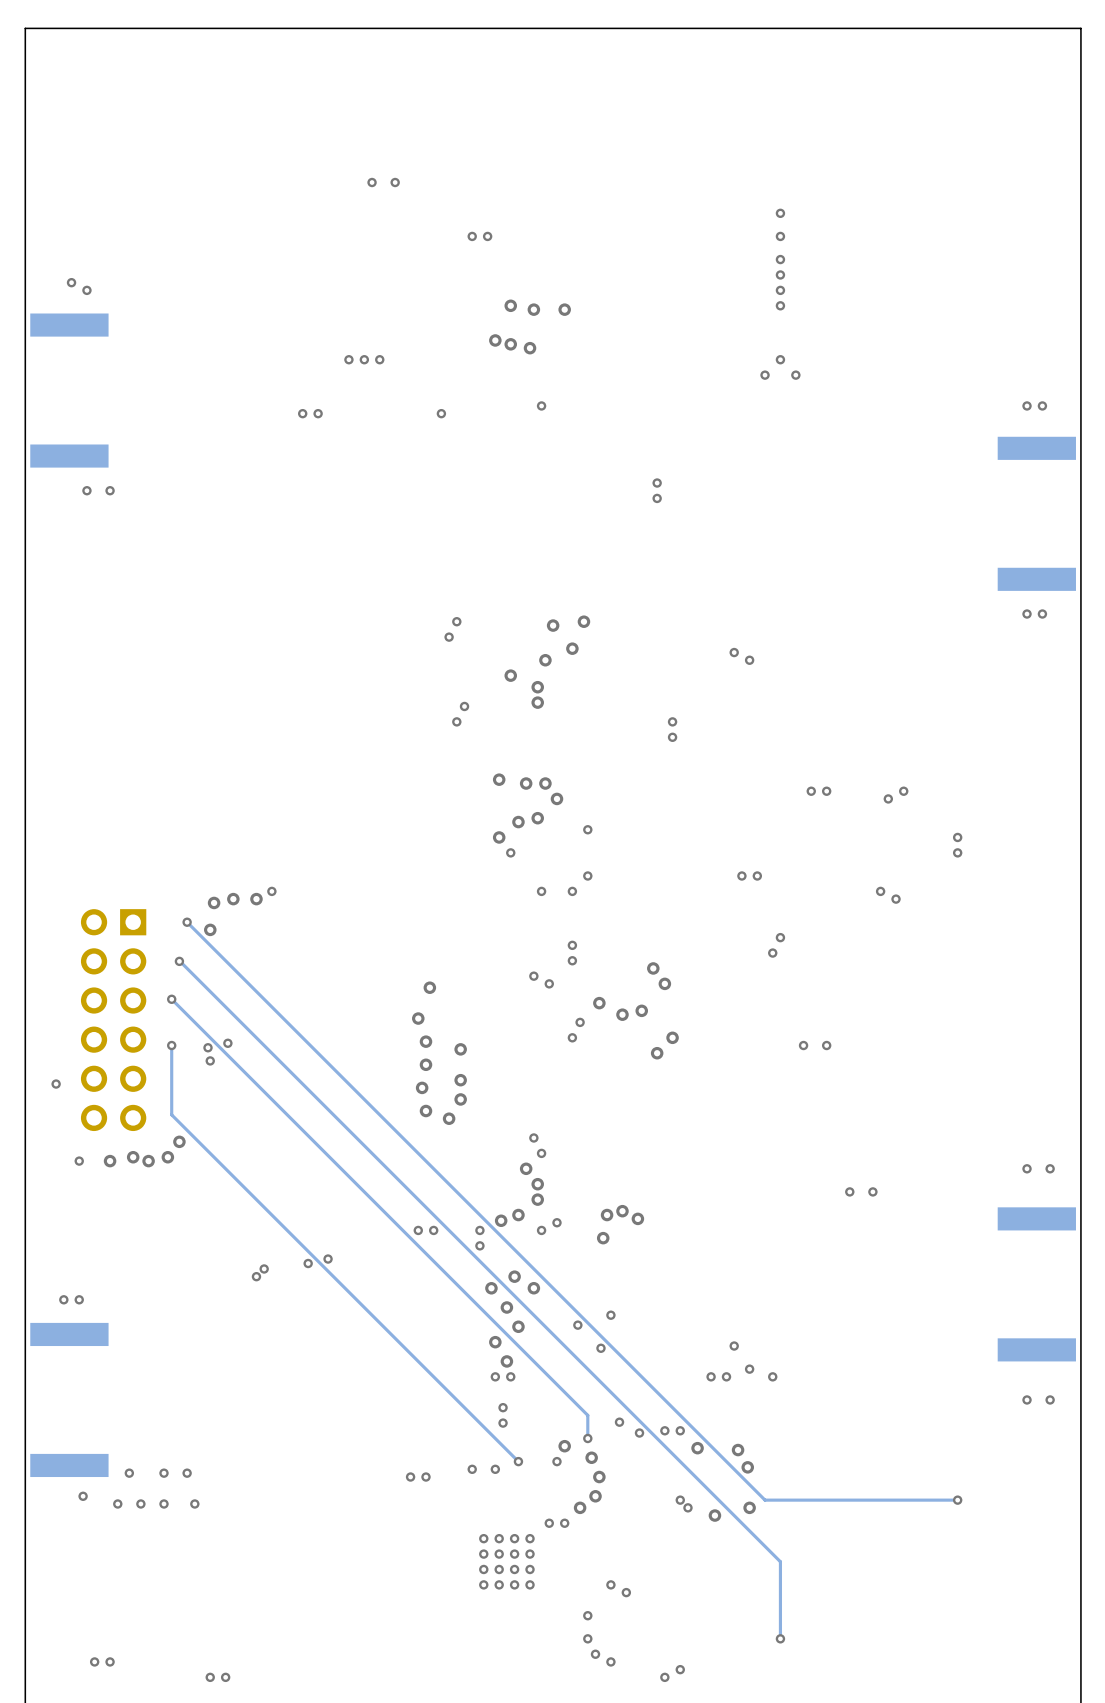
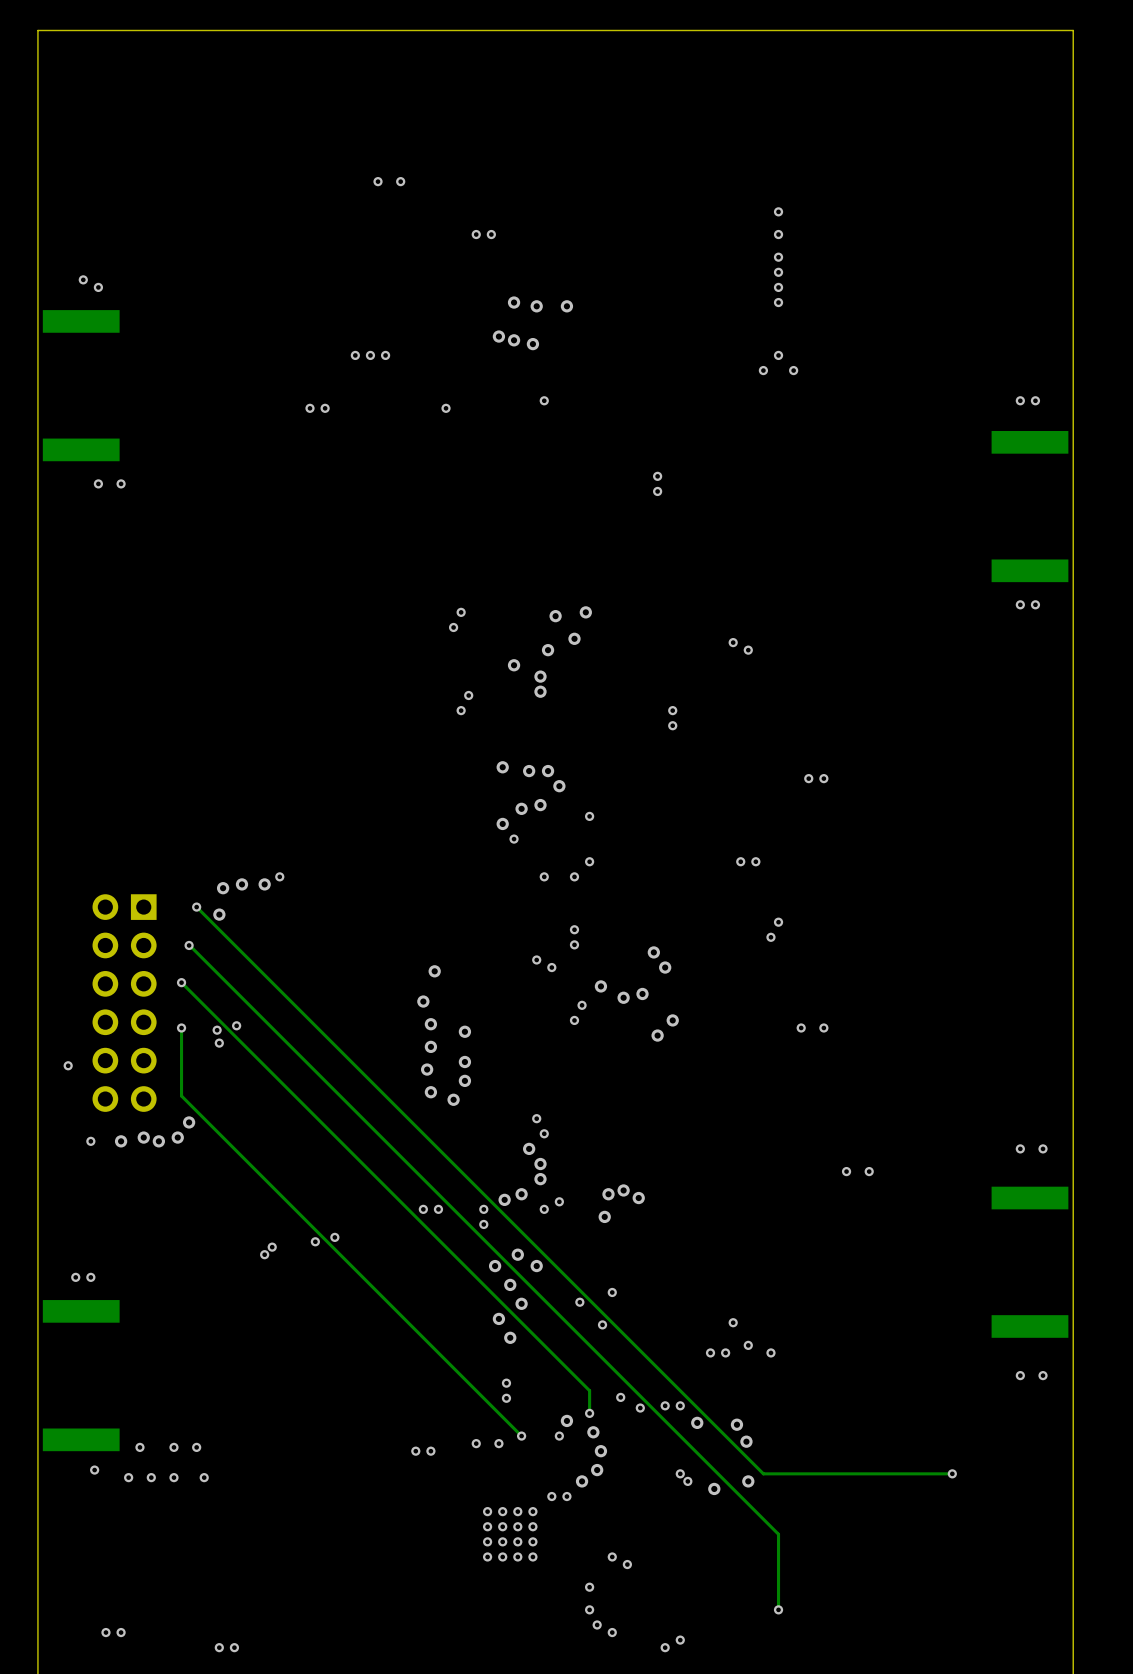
via: (903, 791) -> none
via: (888, 798) -> none
via: (957, 837) -> none
via: (957, 852) -> none
via: (880, 891) -> none
via: (896, 899) -> none
via: (495, 1376) -> none
via: (510, 1376) -> none

